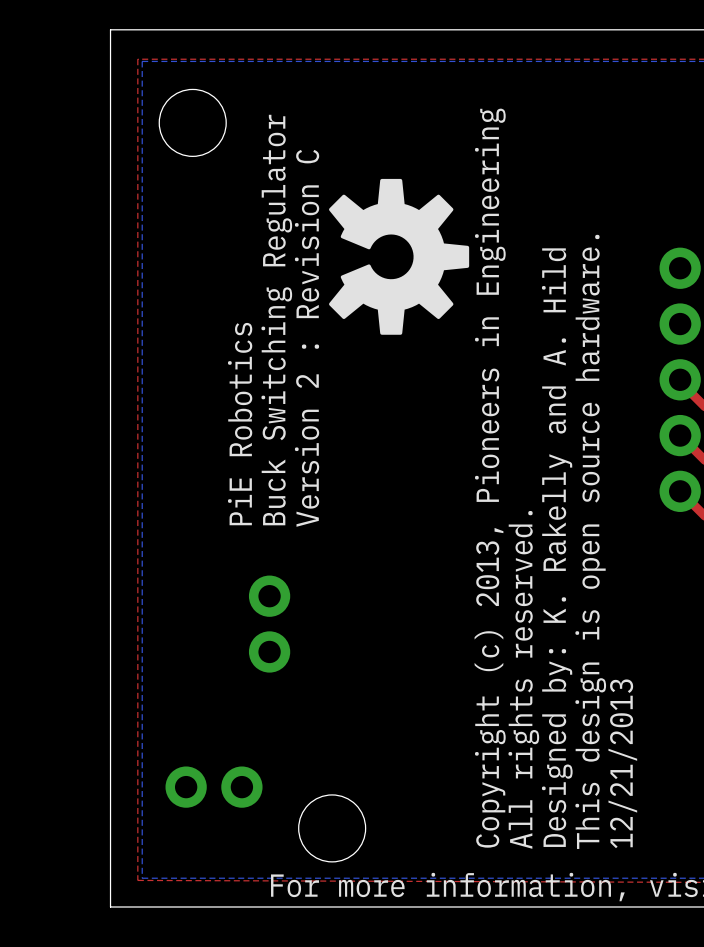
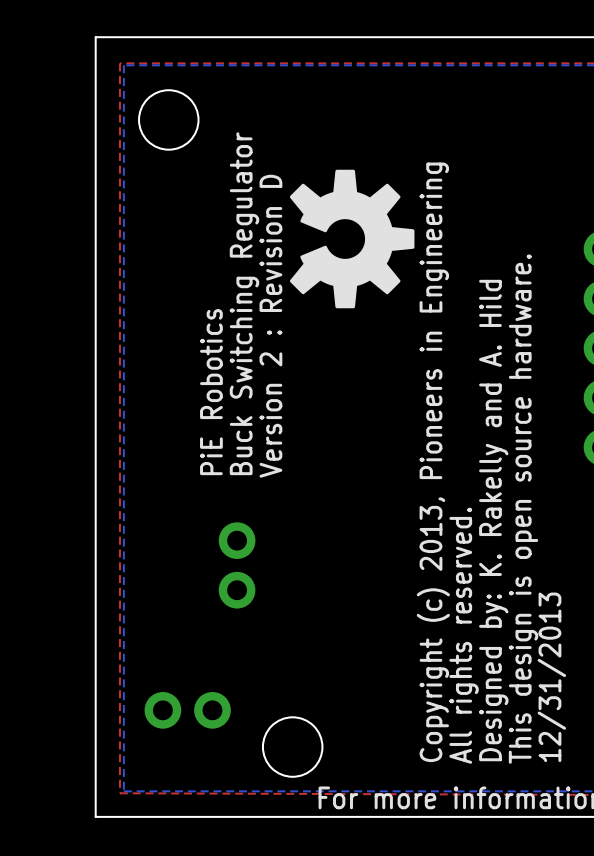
text: Version 2 : Revision C (307, 338) -> Version 2 : Revision D (270, 326)
text: 12/21/2013 (622, 763) -> 12/31/2013 (551, 677)

